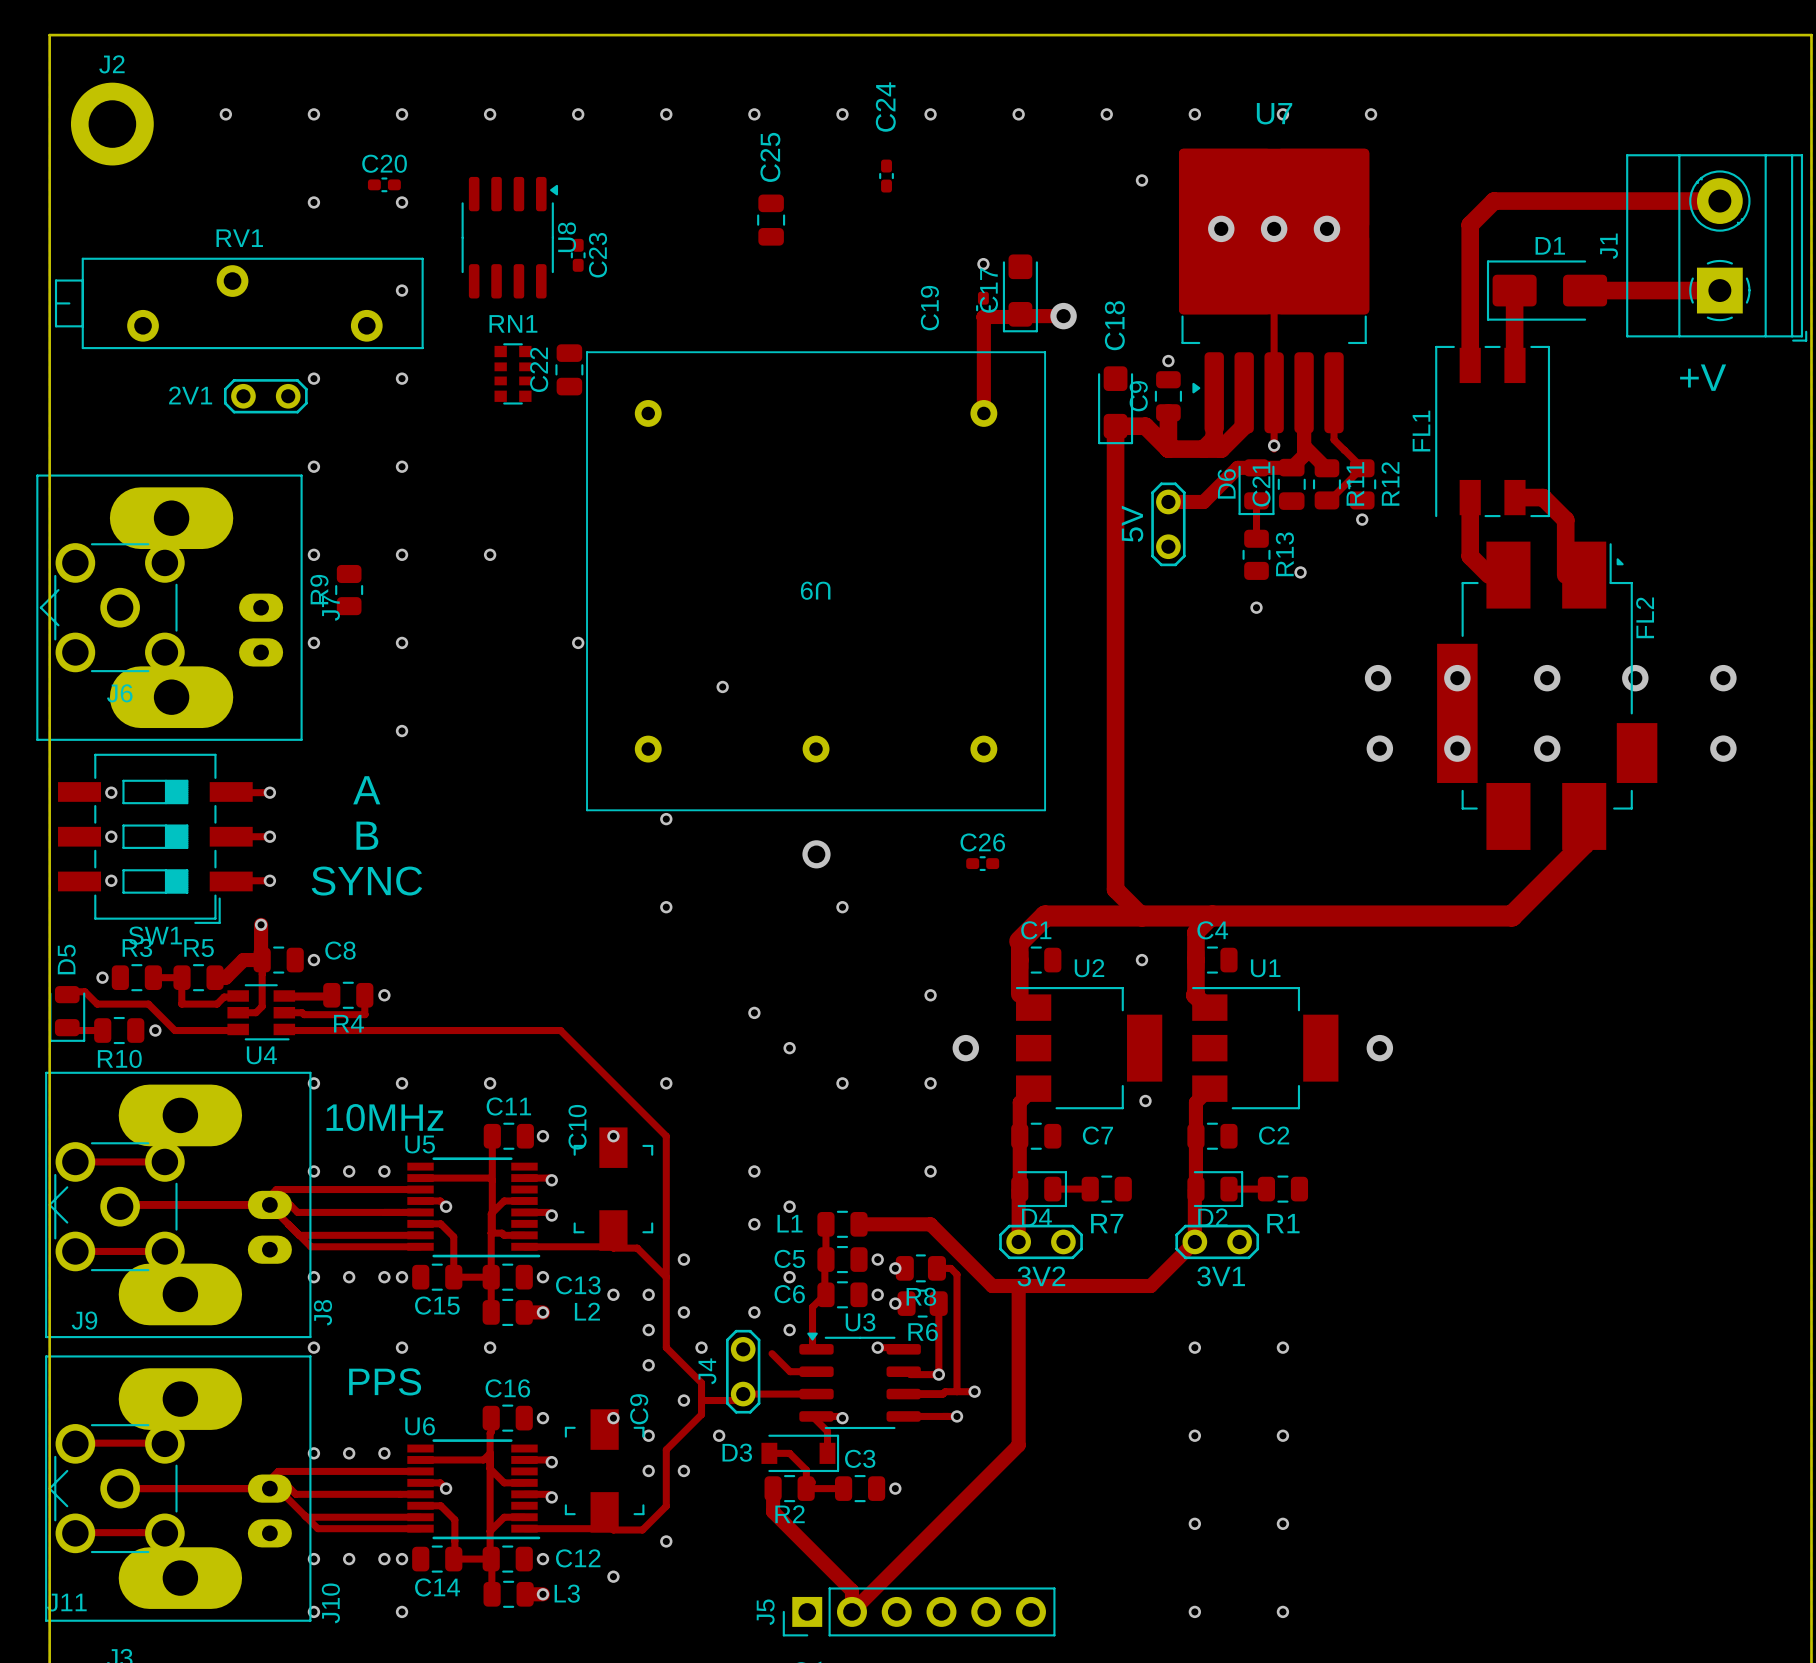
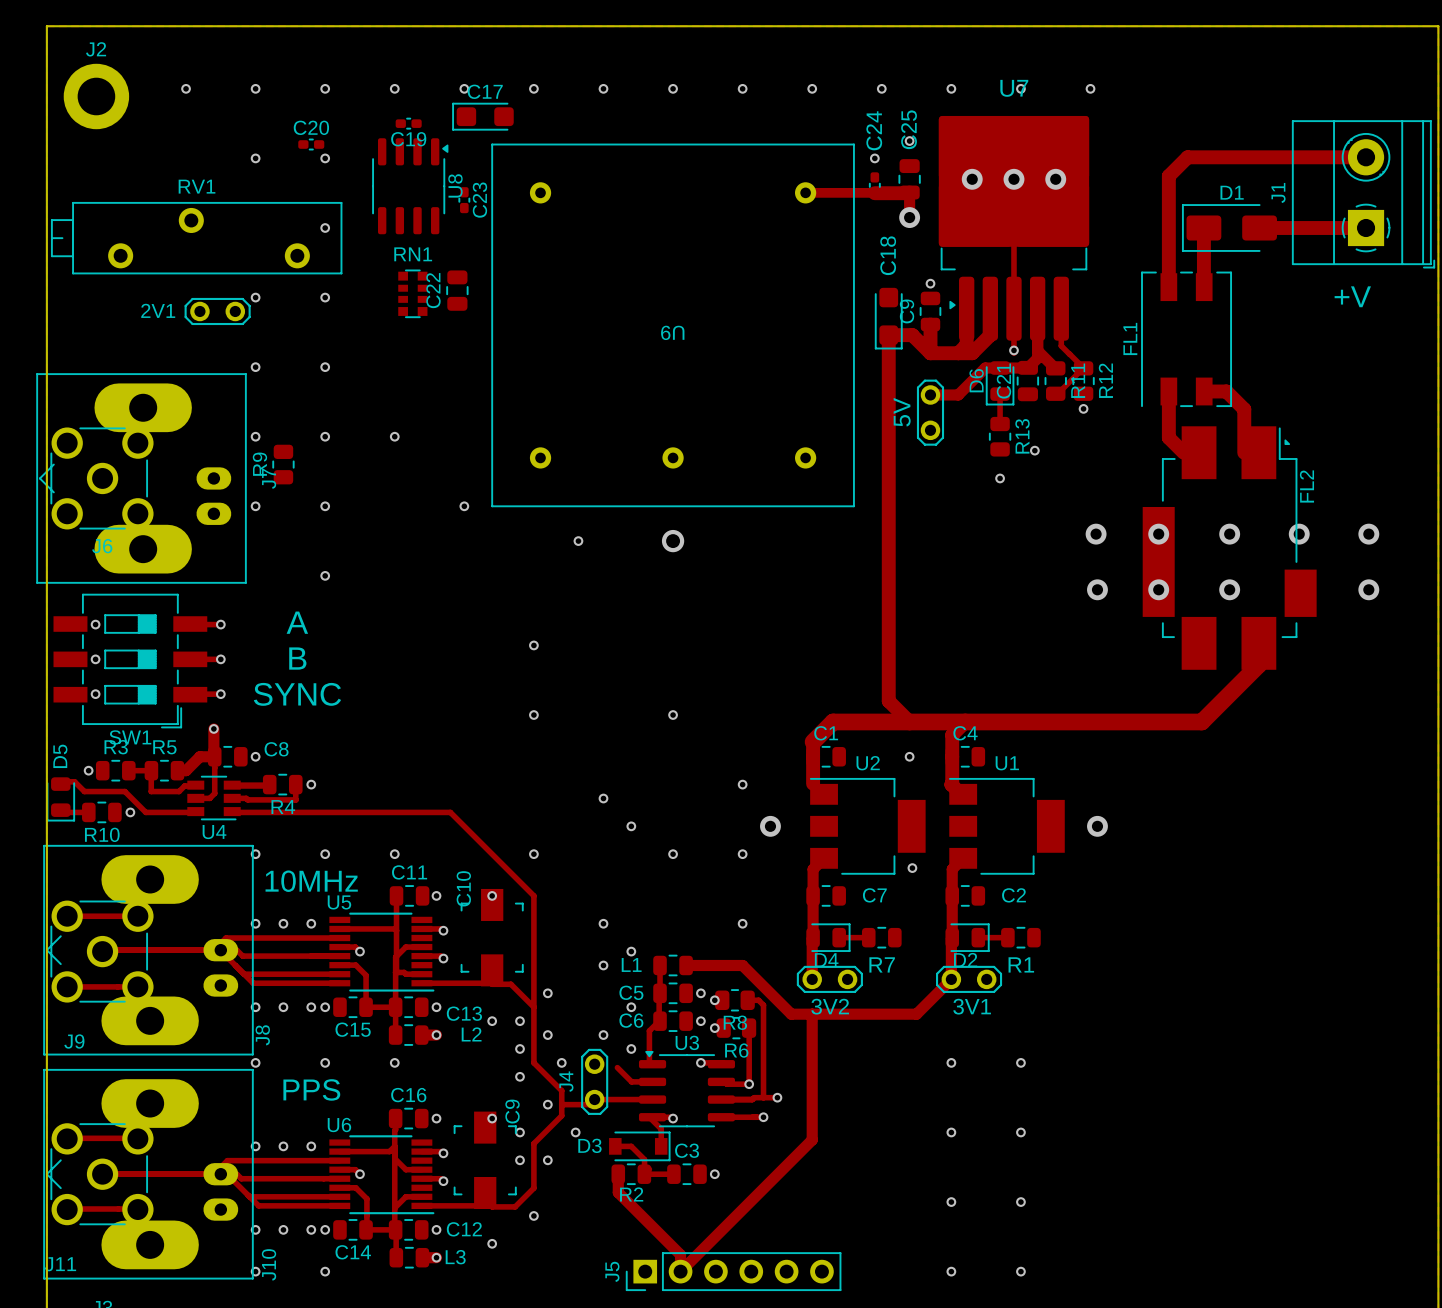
C24 position: (886, 176) -> (874, 185)
via: none -> (874, 158)
C25 position: (771, 220) -> (909, 179)
track: none -> (805, 192) (909, 192) (909, 217)
via: (983, 264) -> none
C17 rotation: 0° (1020, 293) -> 90° clockwise (482, 116)
C17 position: (1020, 293) -> (482, 116)
C19 name position: C19 (929, 308) -> C19 (408, 139)
C19 rotation: 0° (983, 308) -> 90° clockwise (408, 123)
C19 position: (983, 308) -> (408, 123)
track: (1063, 316) (983, 316) (983, 413) -> none
via position: (1063, 316) -> (909, 217)
U9 position: (816, 581) -> (673, 325)
via: none -> (673, 541)
via: (816, 854) -> none
C26: (982, 863) -> none

